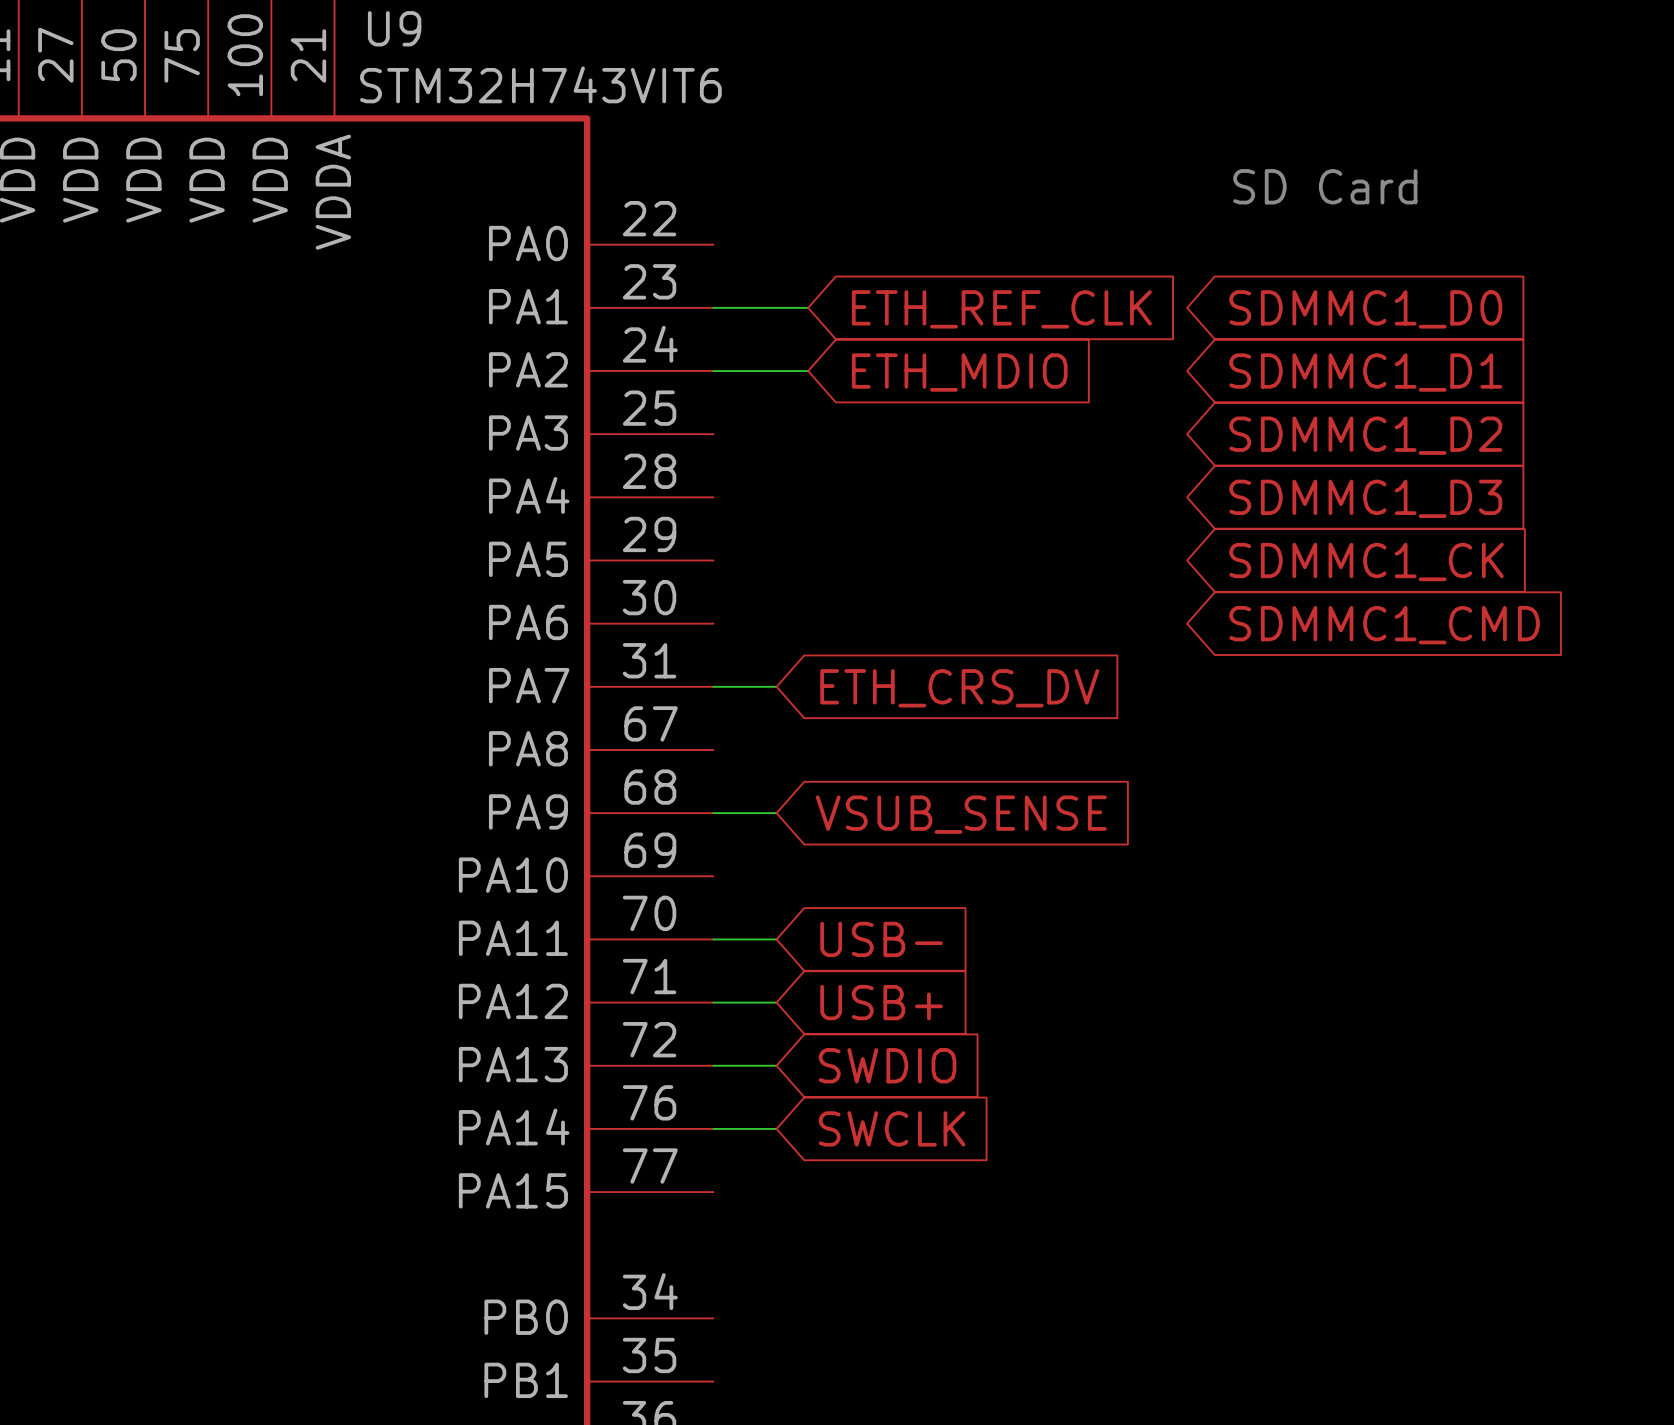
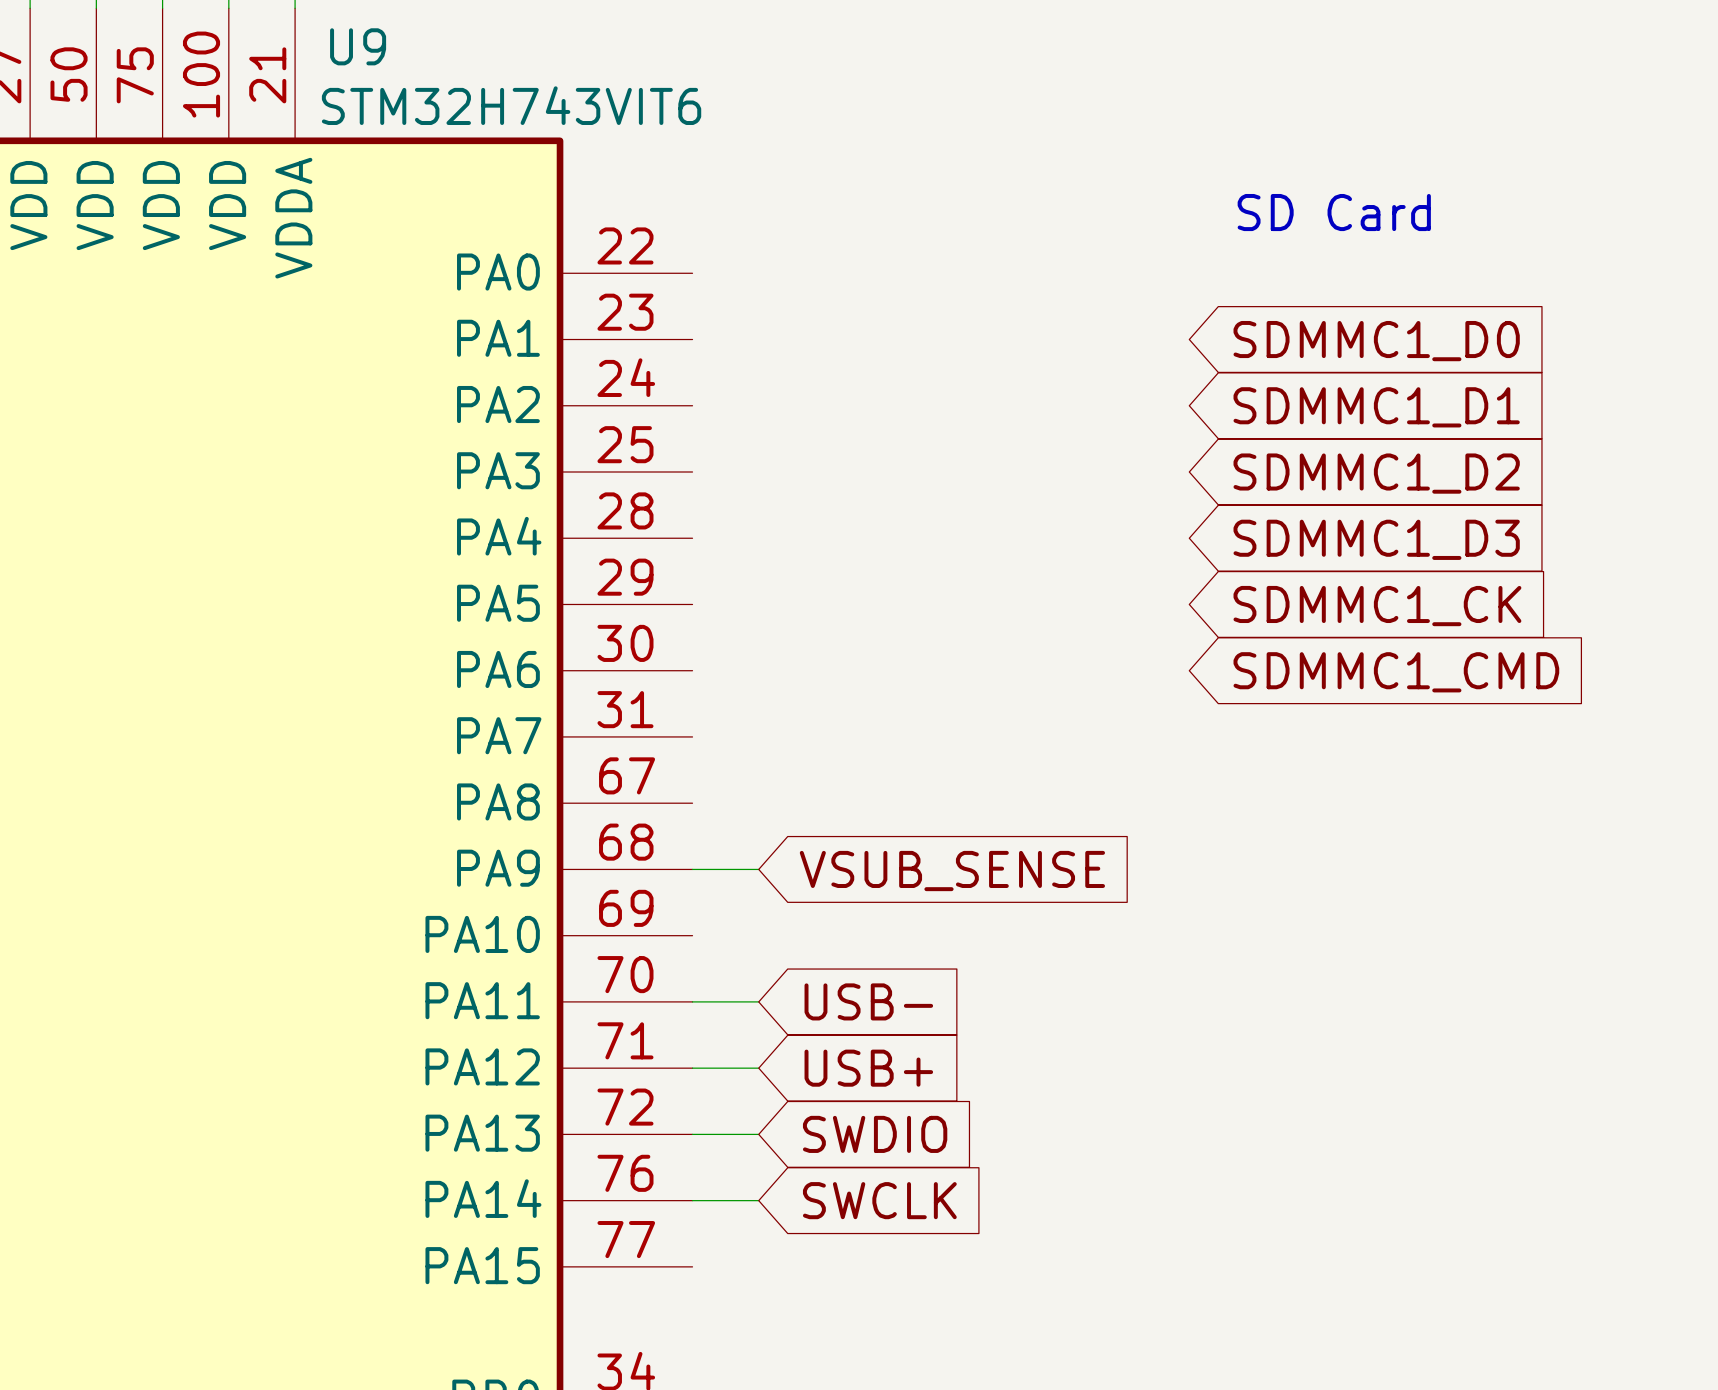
wire: (713, 307) (808, 307) -> none
global label: ETH_REF_CLK (1001, 309) -> none
wire: (713, 371) (808, 371) -> none
global label: ETH_MDIO (959, 372) -> none
wire: (713, 686) (776, 686) -> none
global label: ETH_CRS_DV (959, 688) -> none

